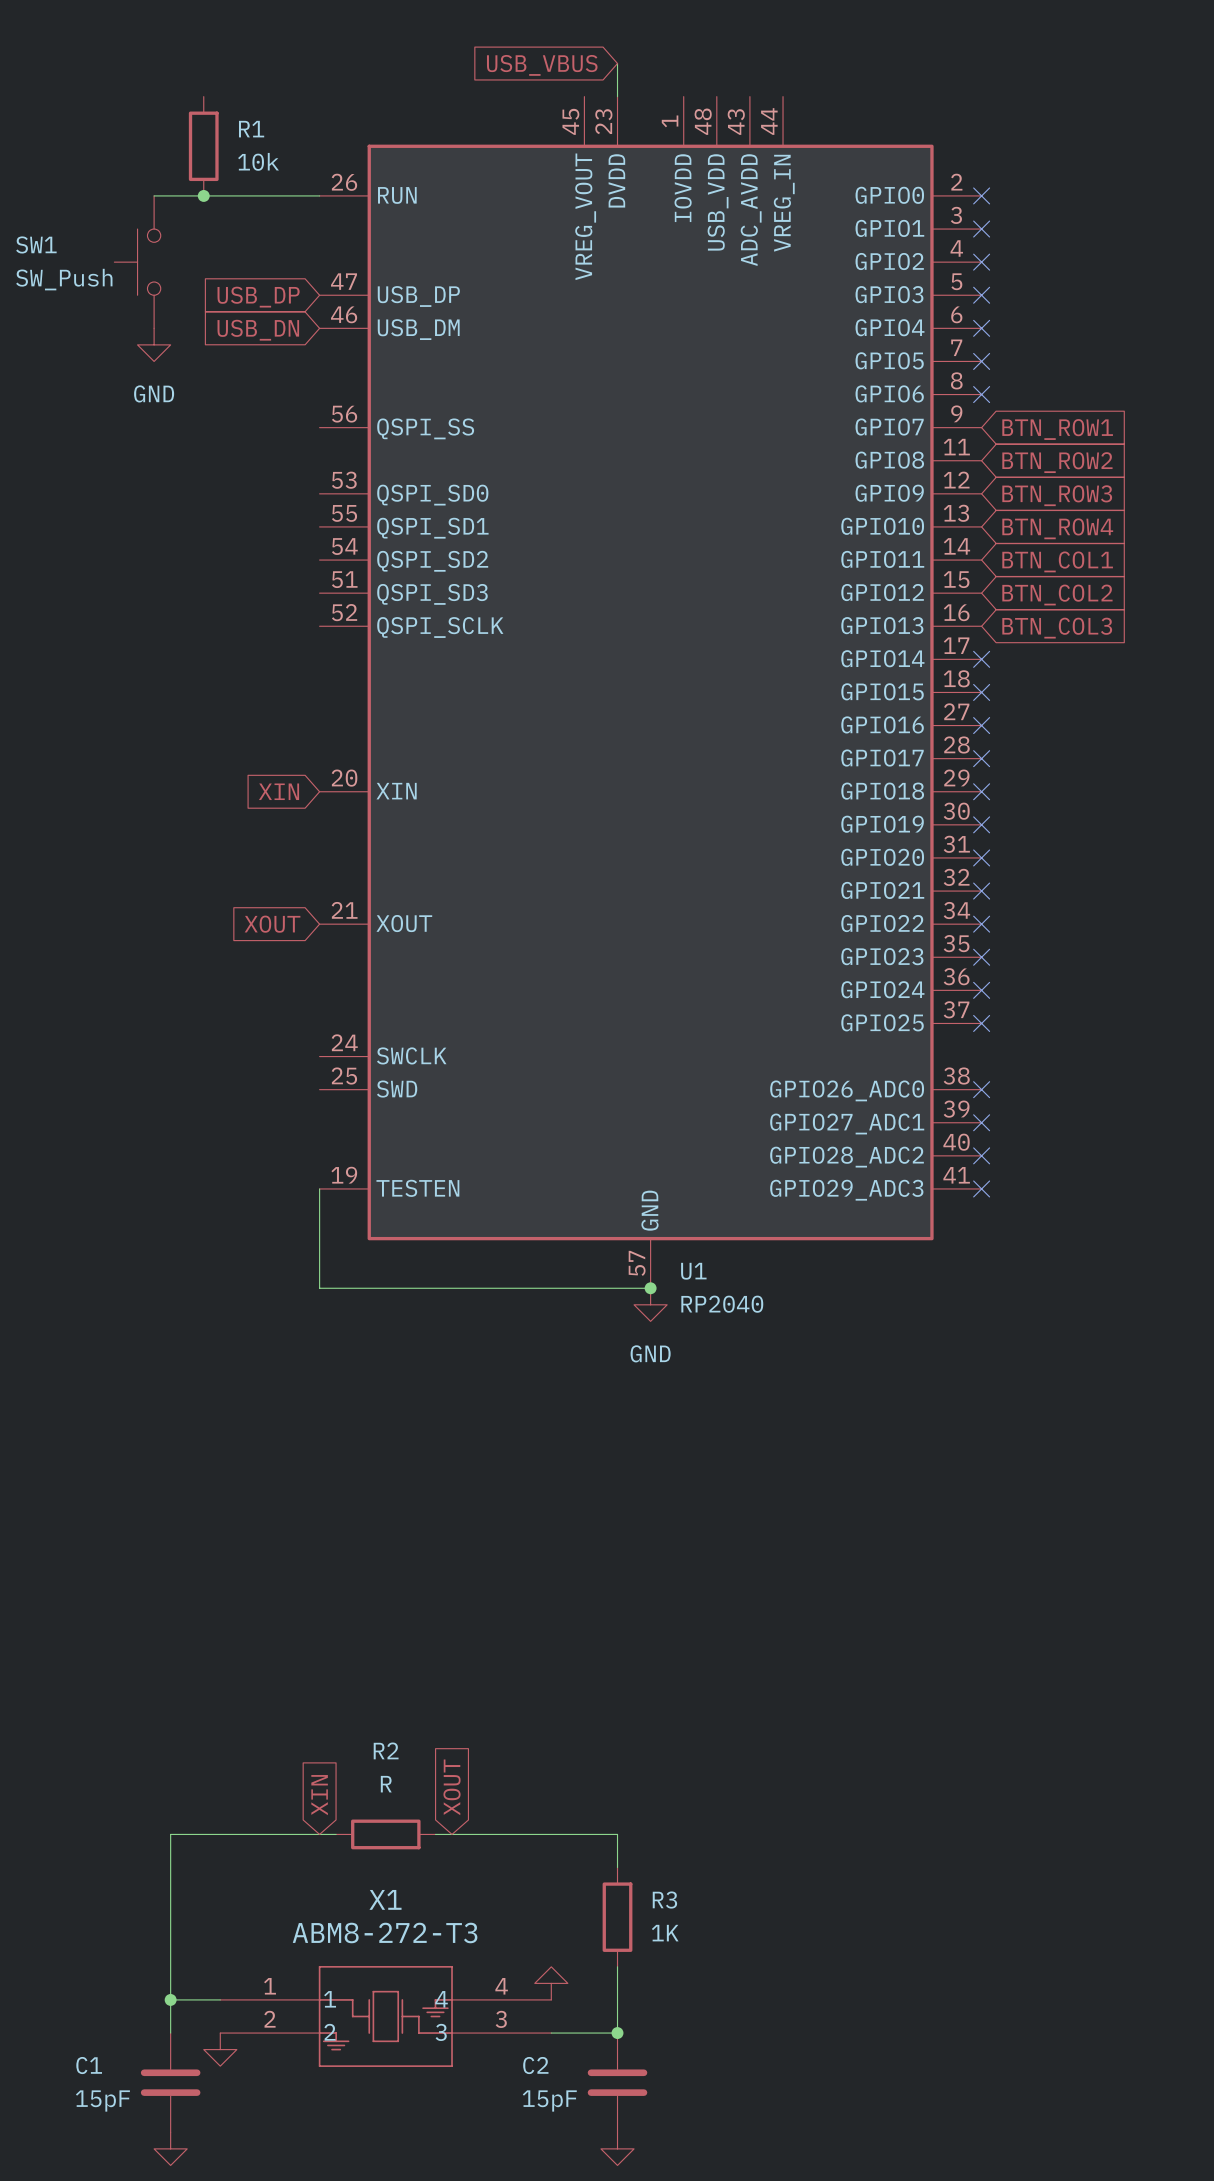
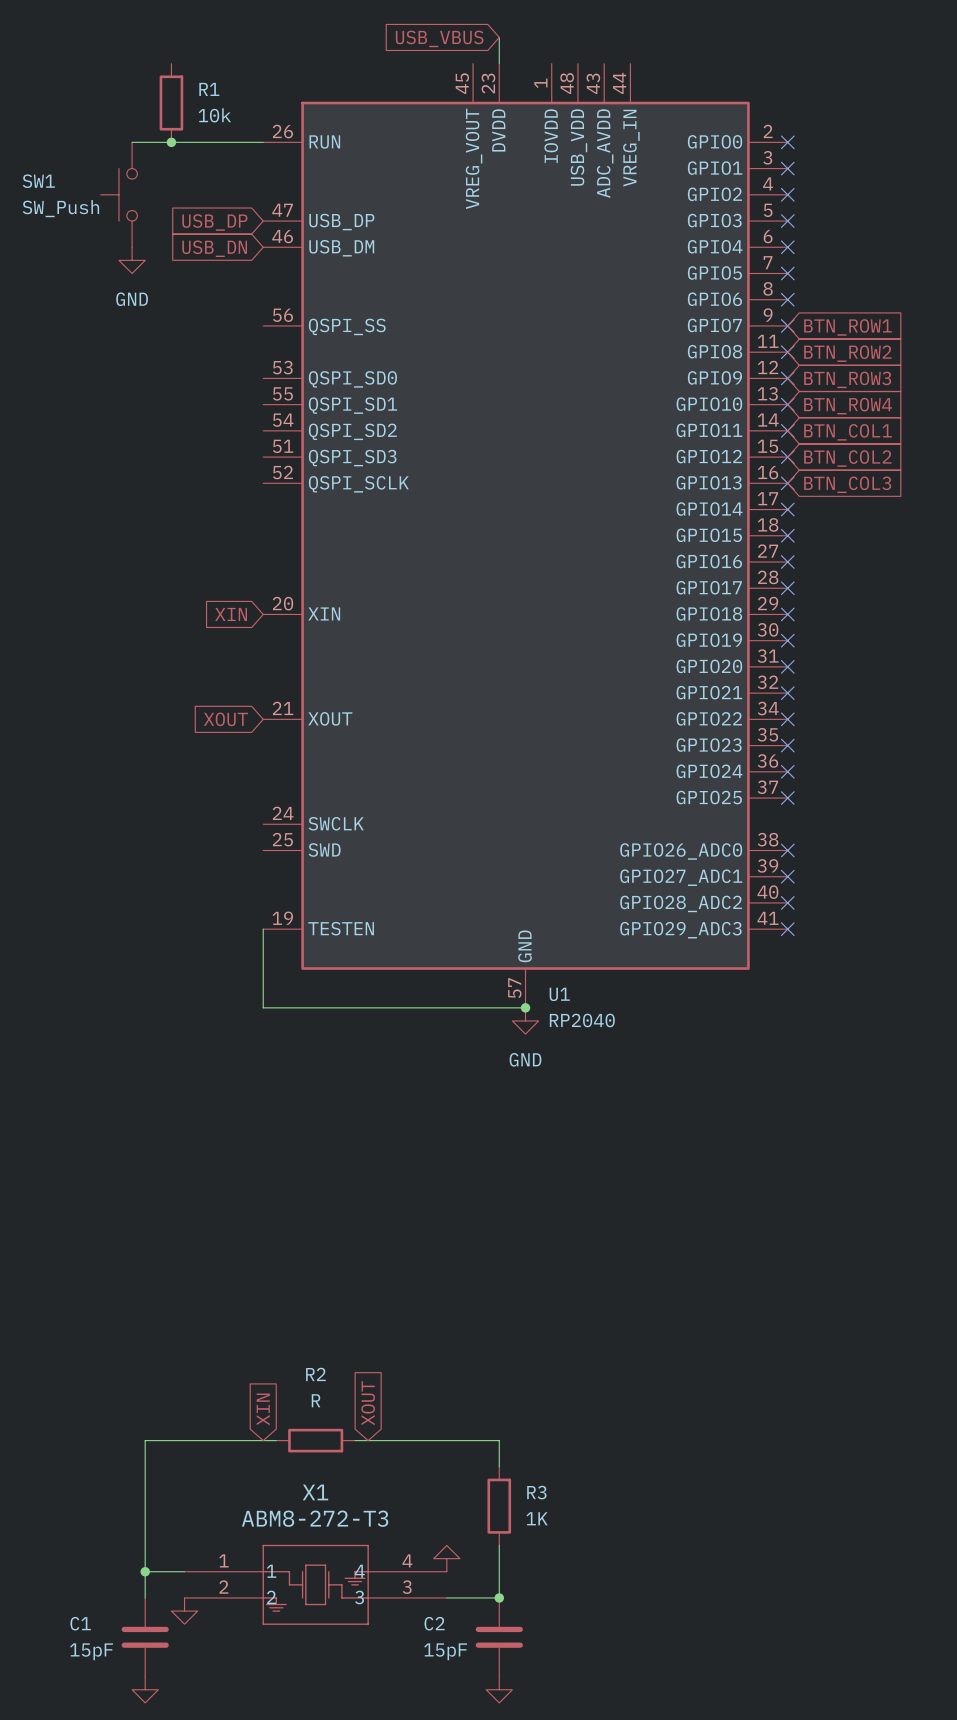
no-connect mark: none -> (787, 325)
no-connect mark: none -> (787, 352)
no-connect mark: none -> (787, 378)
no-connect mark: none -> (787, 404)
no-connect mark: none -> (787, 430)
no-connect mark: none -> (787, 457)
no-connect mark: none -> (787, 483)

